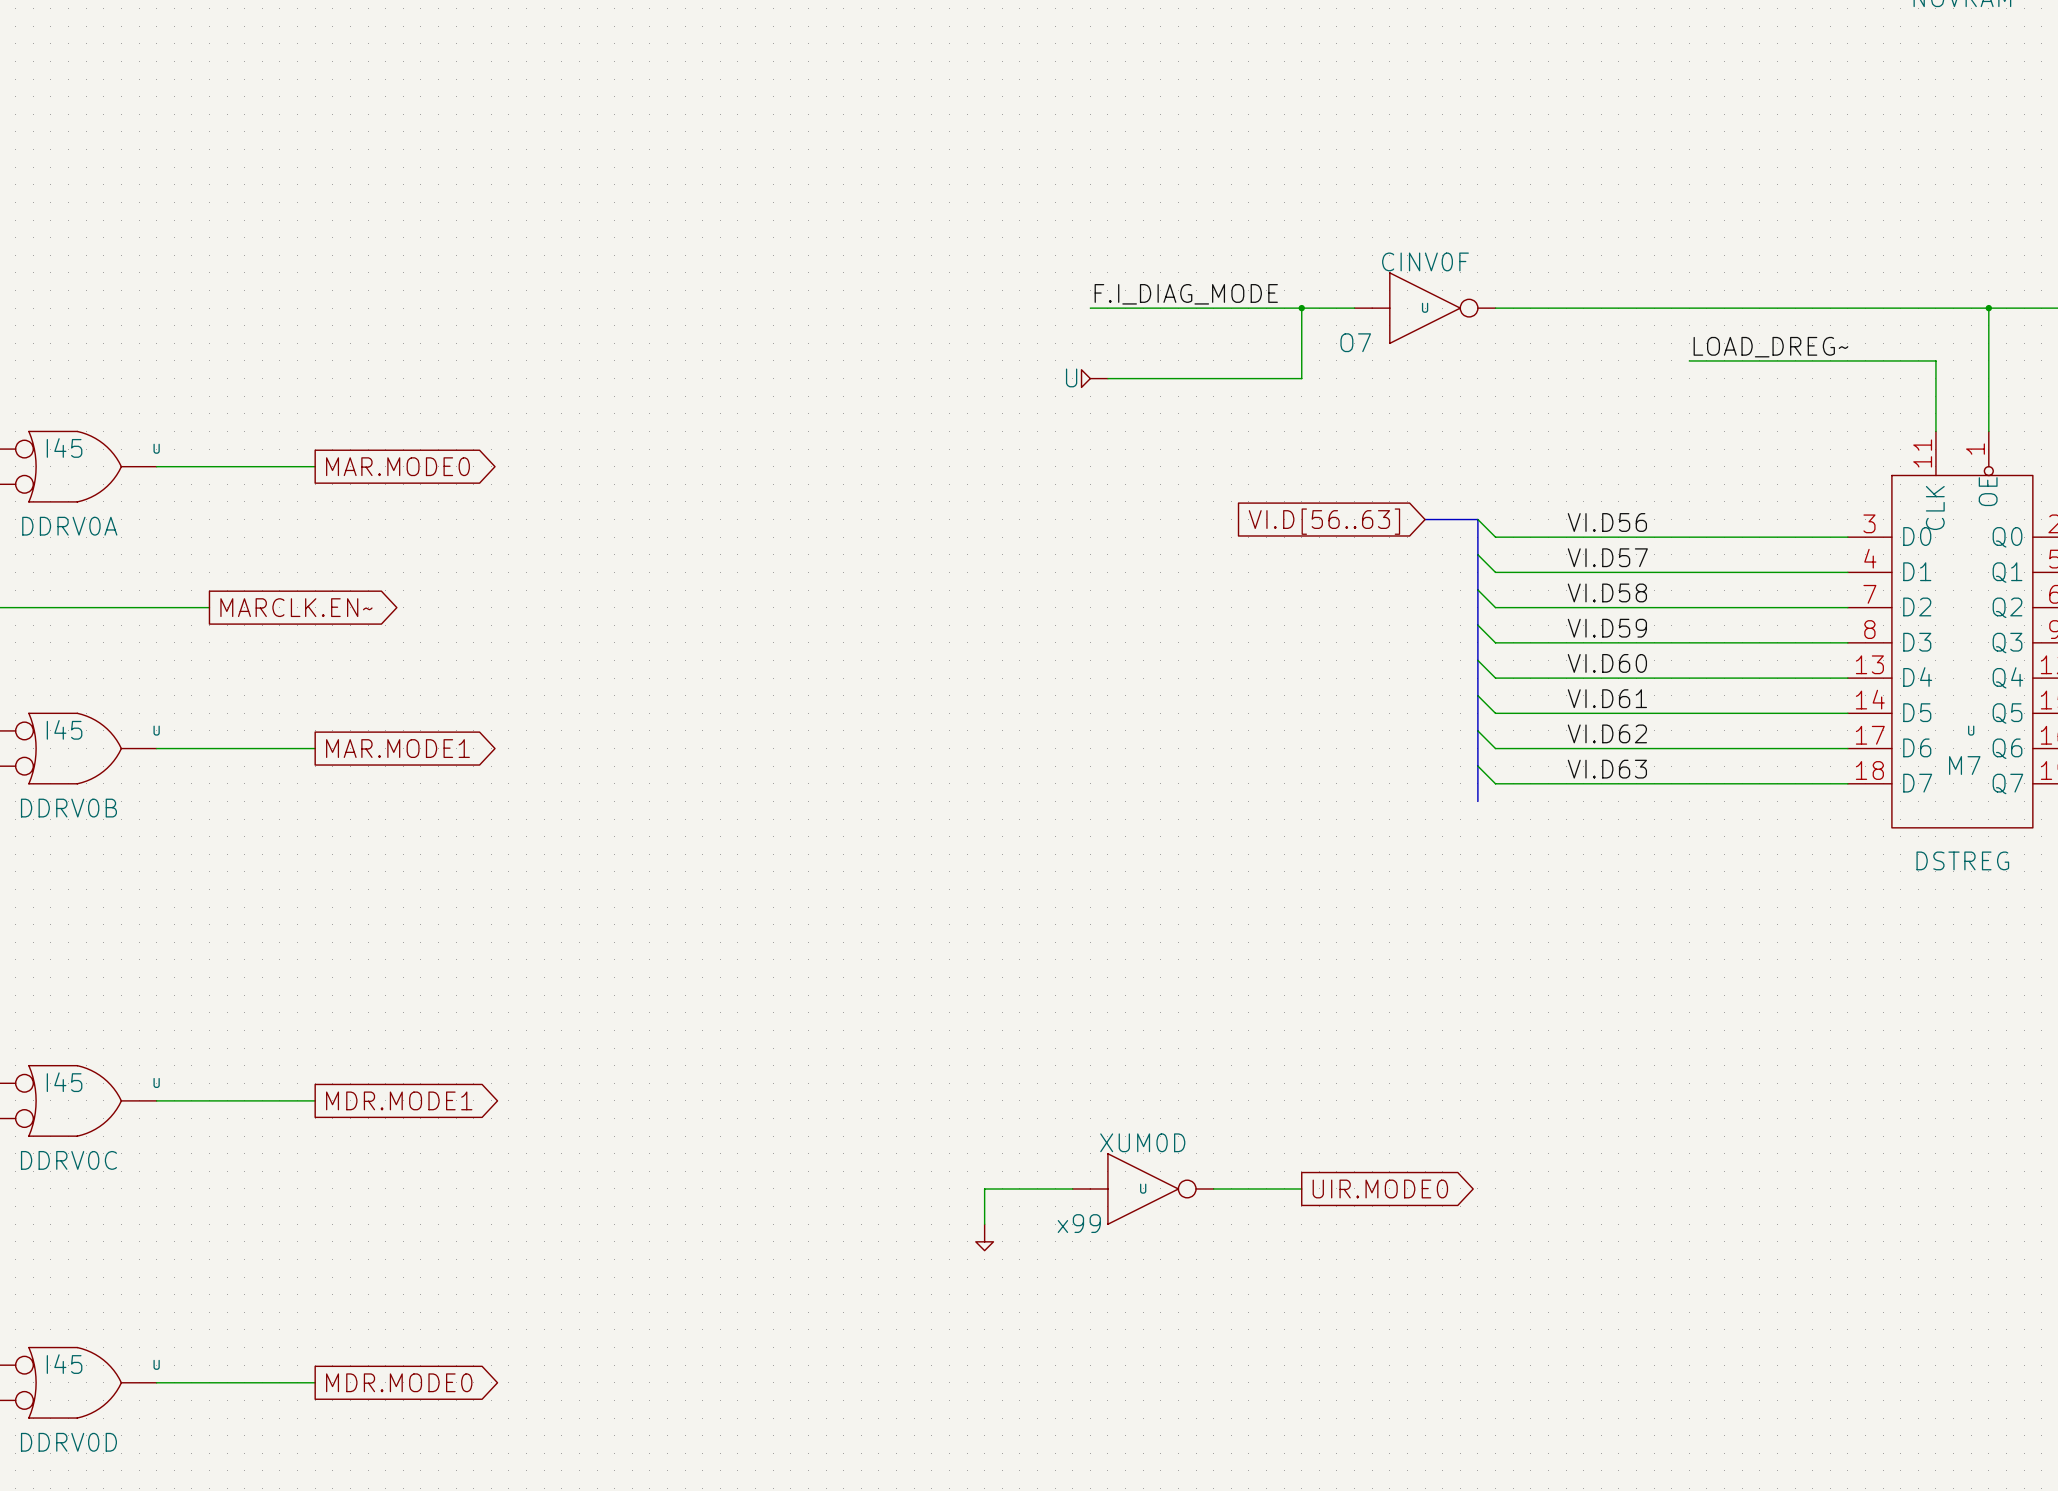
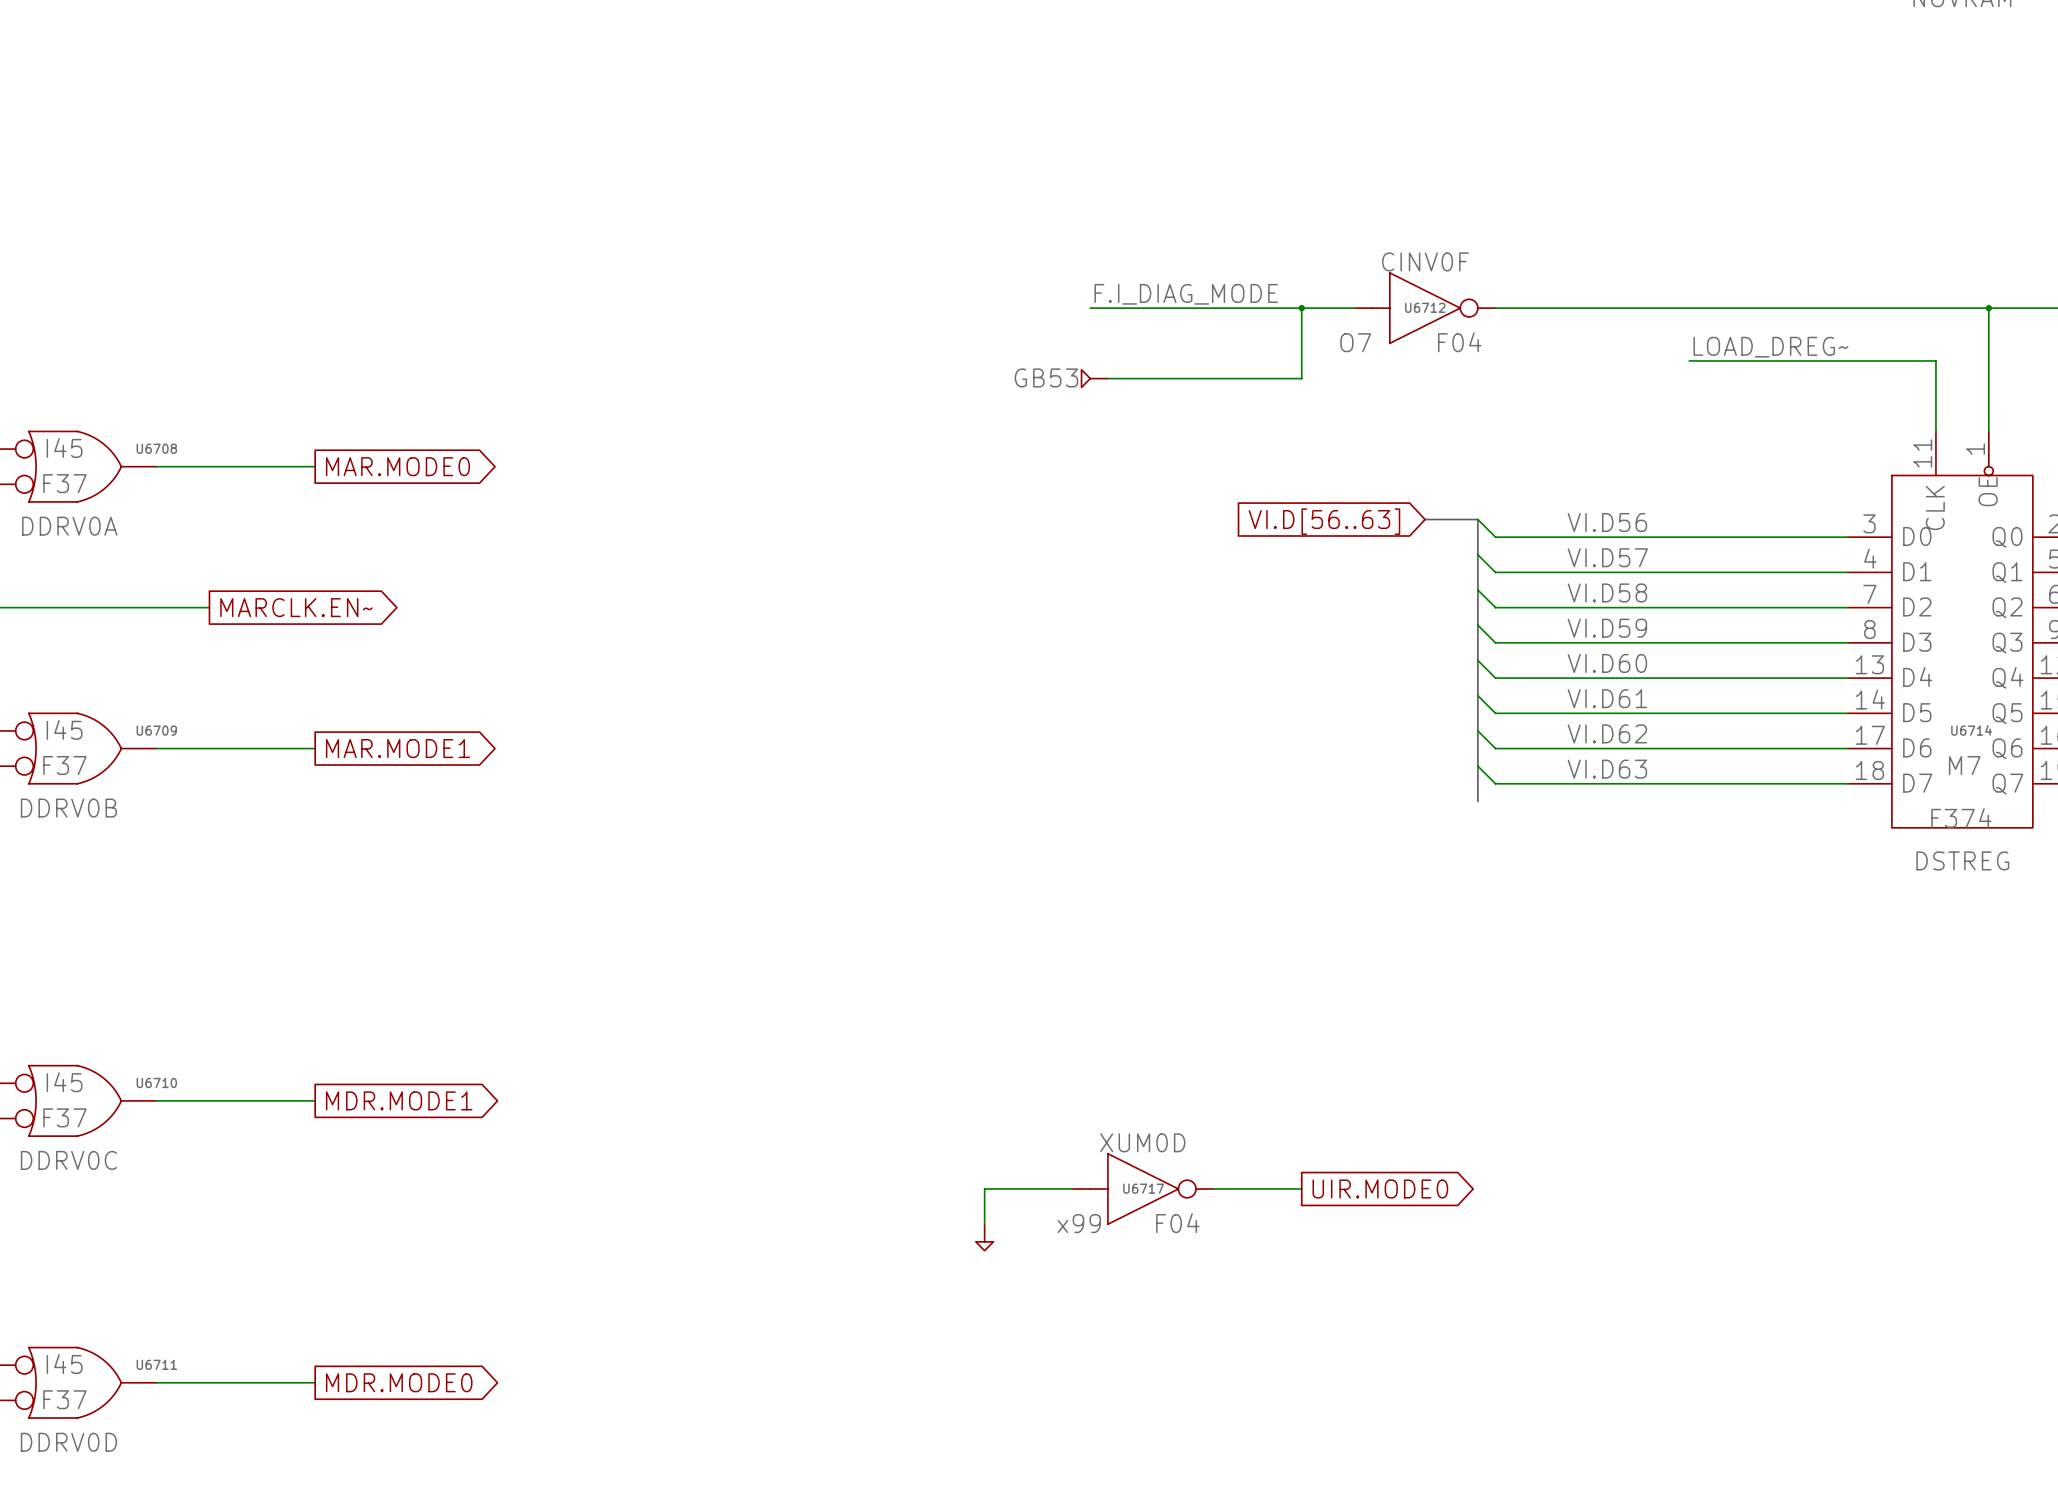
U name: U (1425, 307) -> U6712 (1425, 307)
U value: none -> F04 (1459, 342)
U name: U (1071, 377) -> GB53 (1046, 377)
U name: U (156, 448) -> U6708 (156, 448)
U value: none -> F37 (64, 483)
U name: U (156, 730) -> U6709 (156, 730)
U name: U (1971, 730) -> U6714 (1971, 730)
U value: none -> F37 (64, 765)
U value: none -> F374 (1961, 817)
U name: U (156, 1082) -> U6710 (156, 1082)
U value: none -> F37 (64, 1117)
U name: U (1143, 1188) -> U6717 (1143, 1188)
U value: none -> F04 (1177, 1223)
U name: U (156, 1364) -> U6711 (156, 1364)
U value: none -> F37 (64, 1399)

